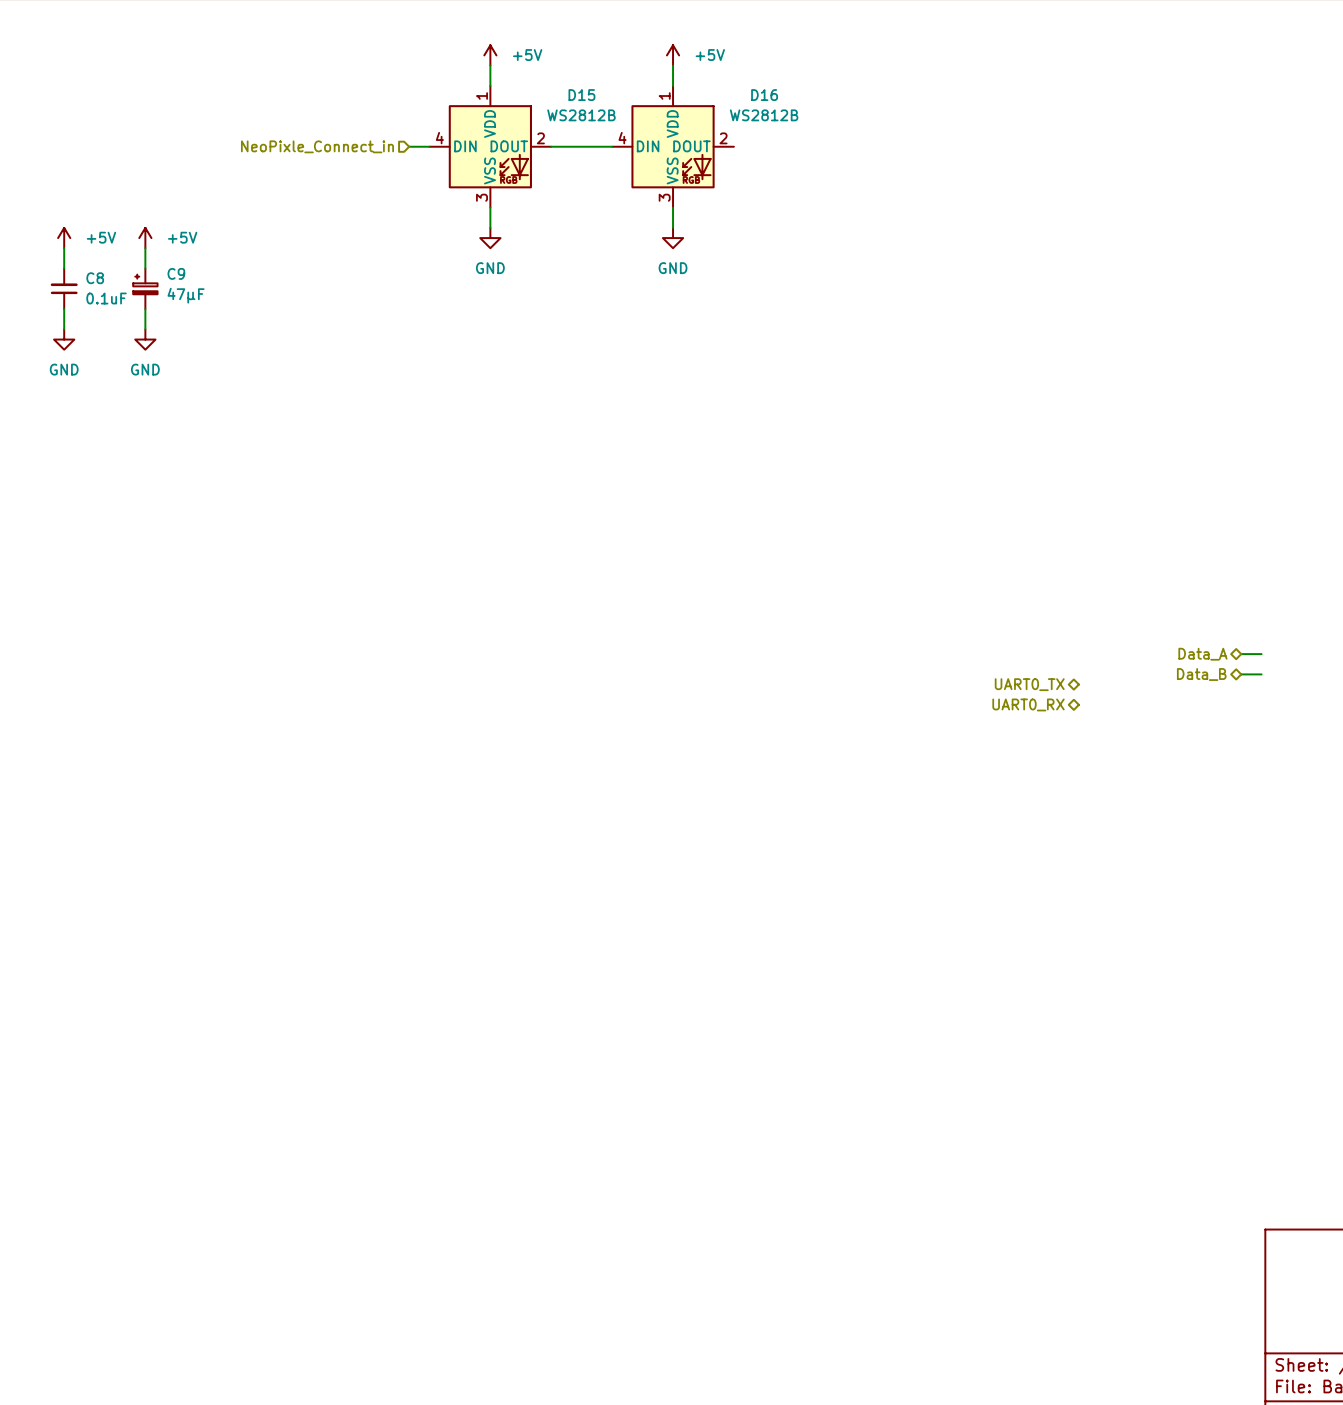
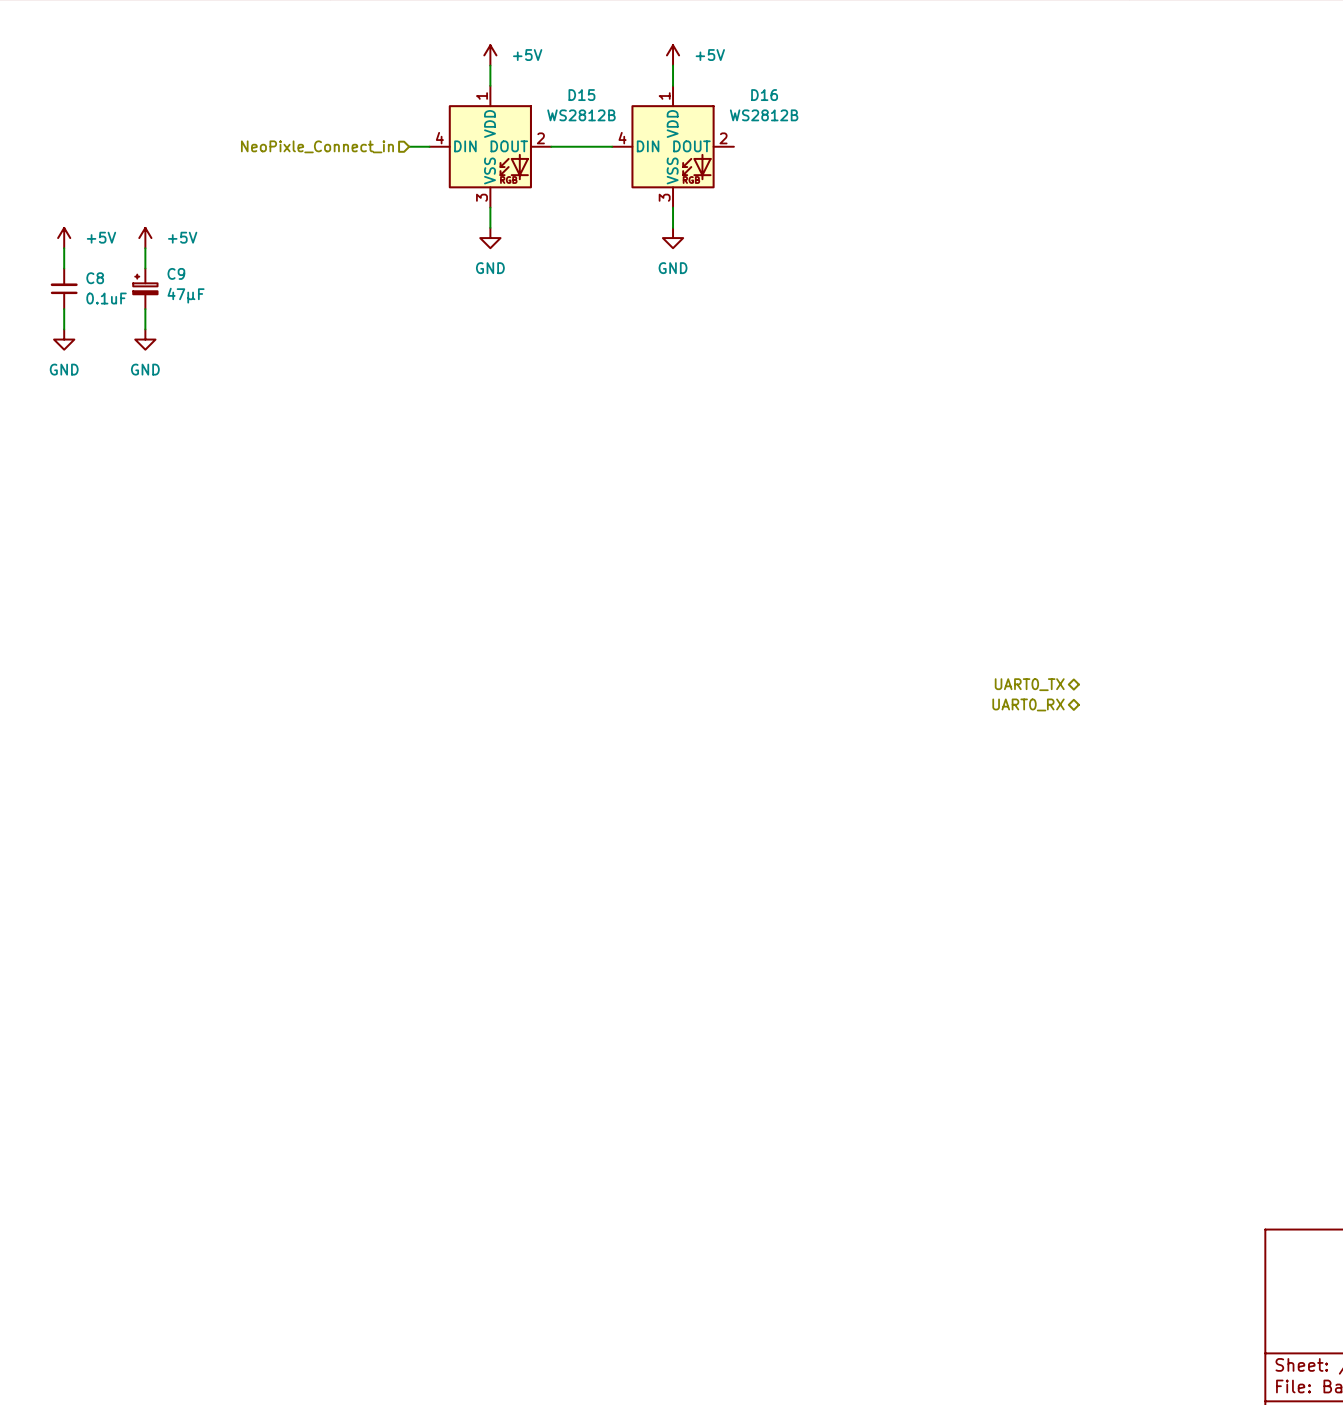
hierarchical label: Data_A (1202, 654) -> none
wire: (1241, 654) (1261, 654) -> none
hierarchical label: Data_B (1201, 674) -> none
wire: (1241, 674) (1261, 674) -> none

